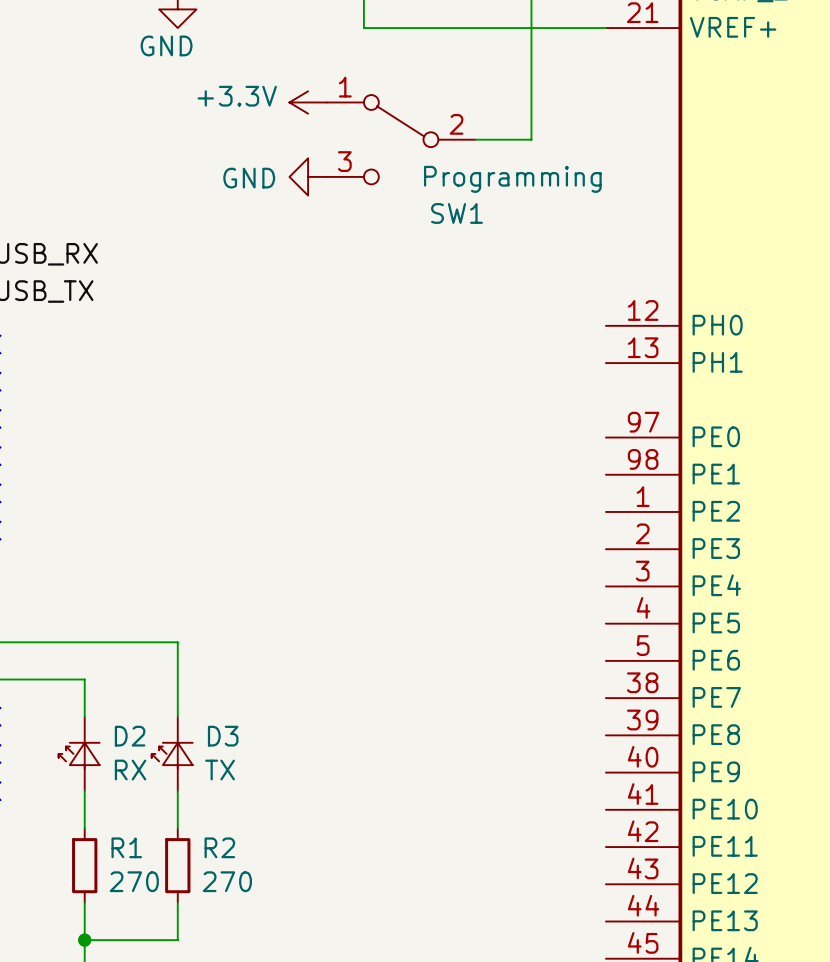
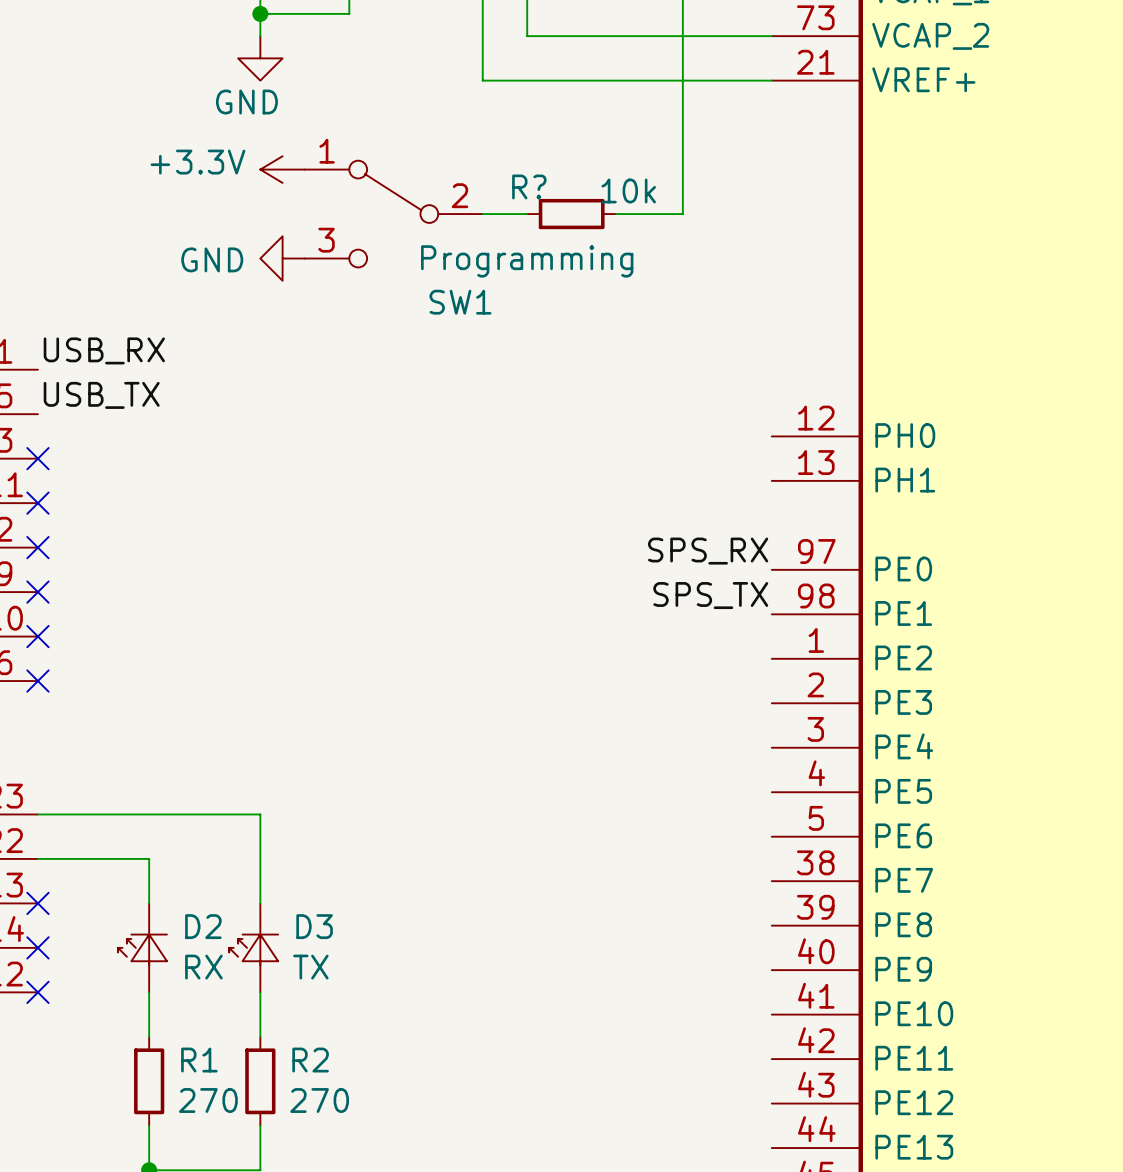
power symbol position: +3.3V (308, 102) -> +3.3V (282, 169)
wire: none -> (482, 214) (527, 214)
SW1 position: (401, 139) -> (393, 214)
R?: none -> 10k (571, 214)
power symbol position: GND (308, 176) -> GND (282, 258)
label: none -> SPS_RX (708, 551)
label: none -> SPS_TX (710, 595)

